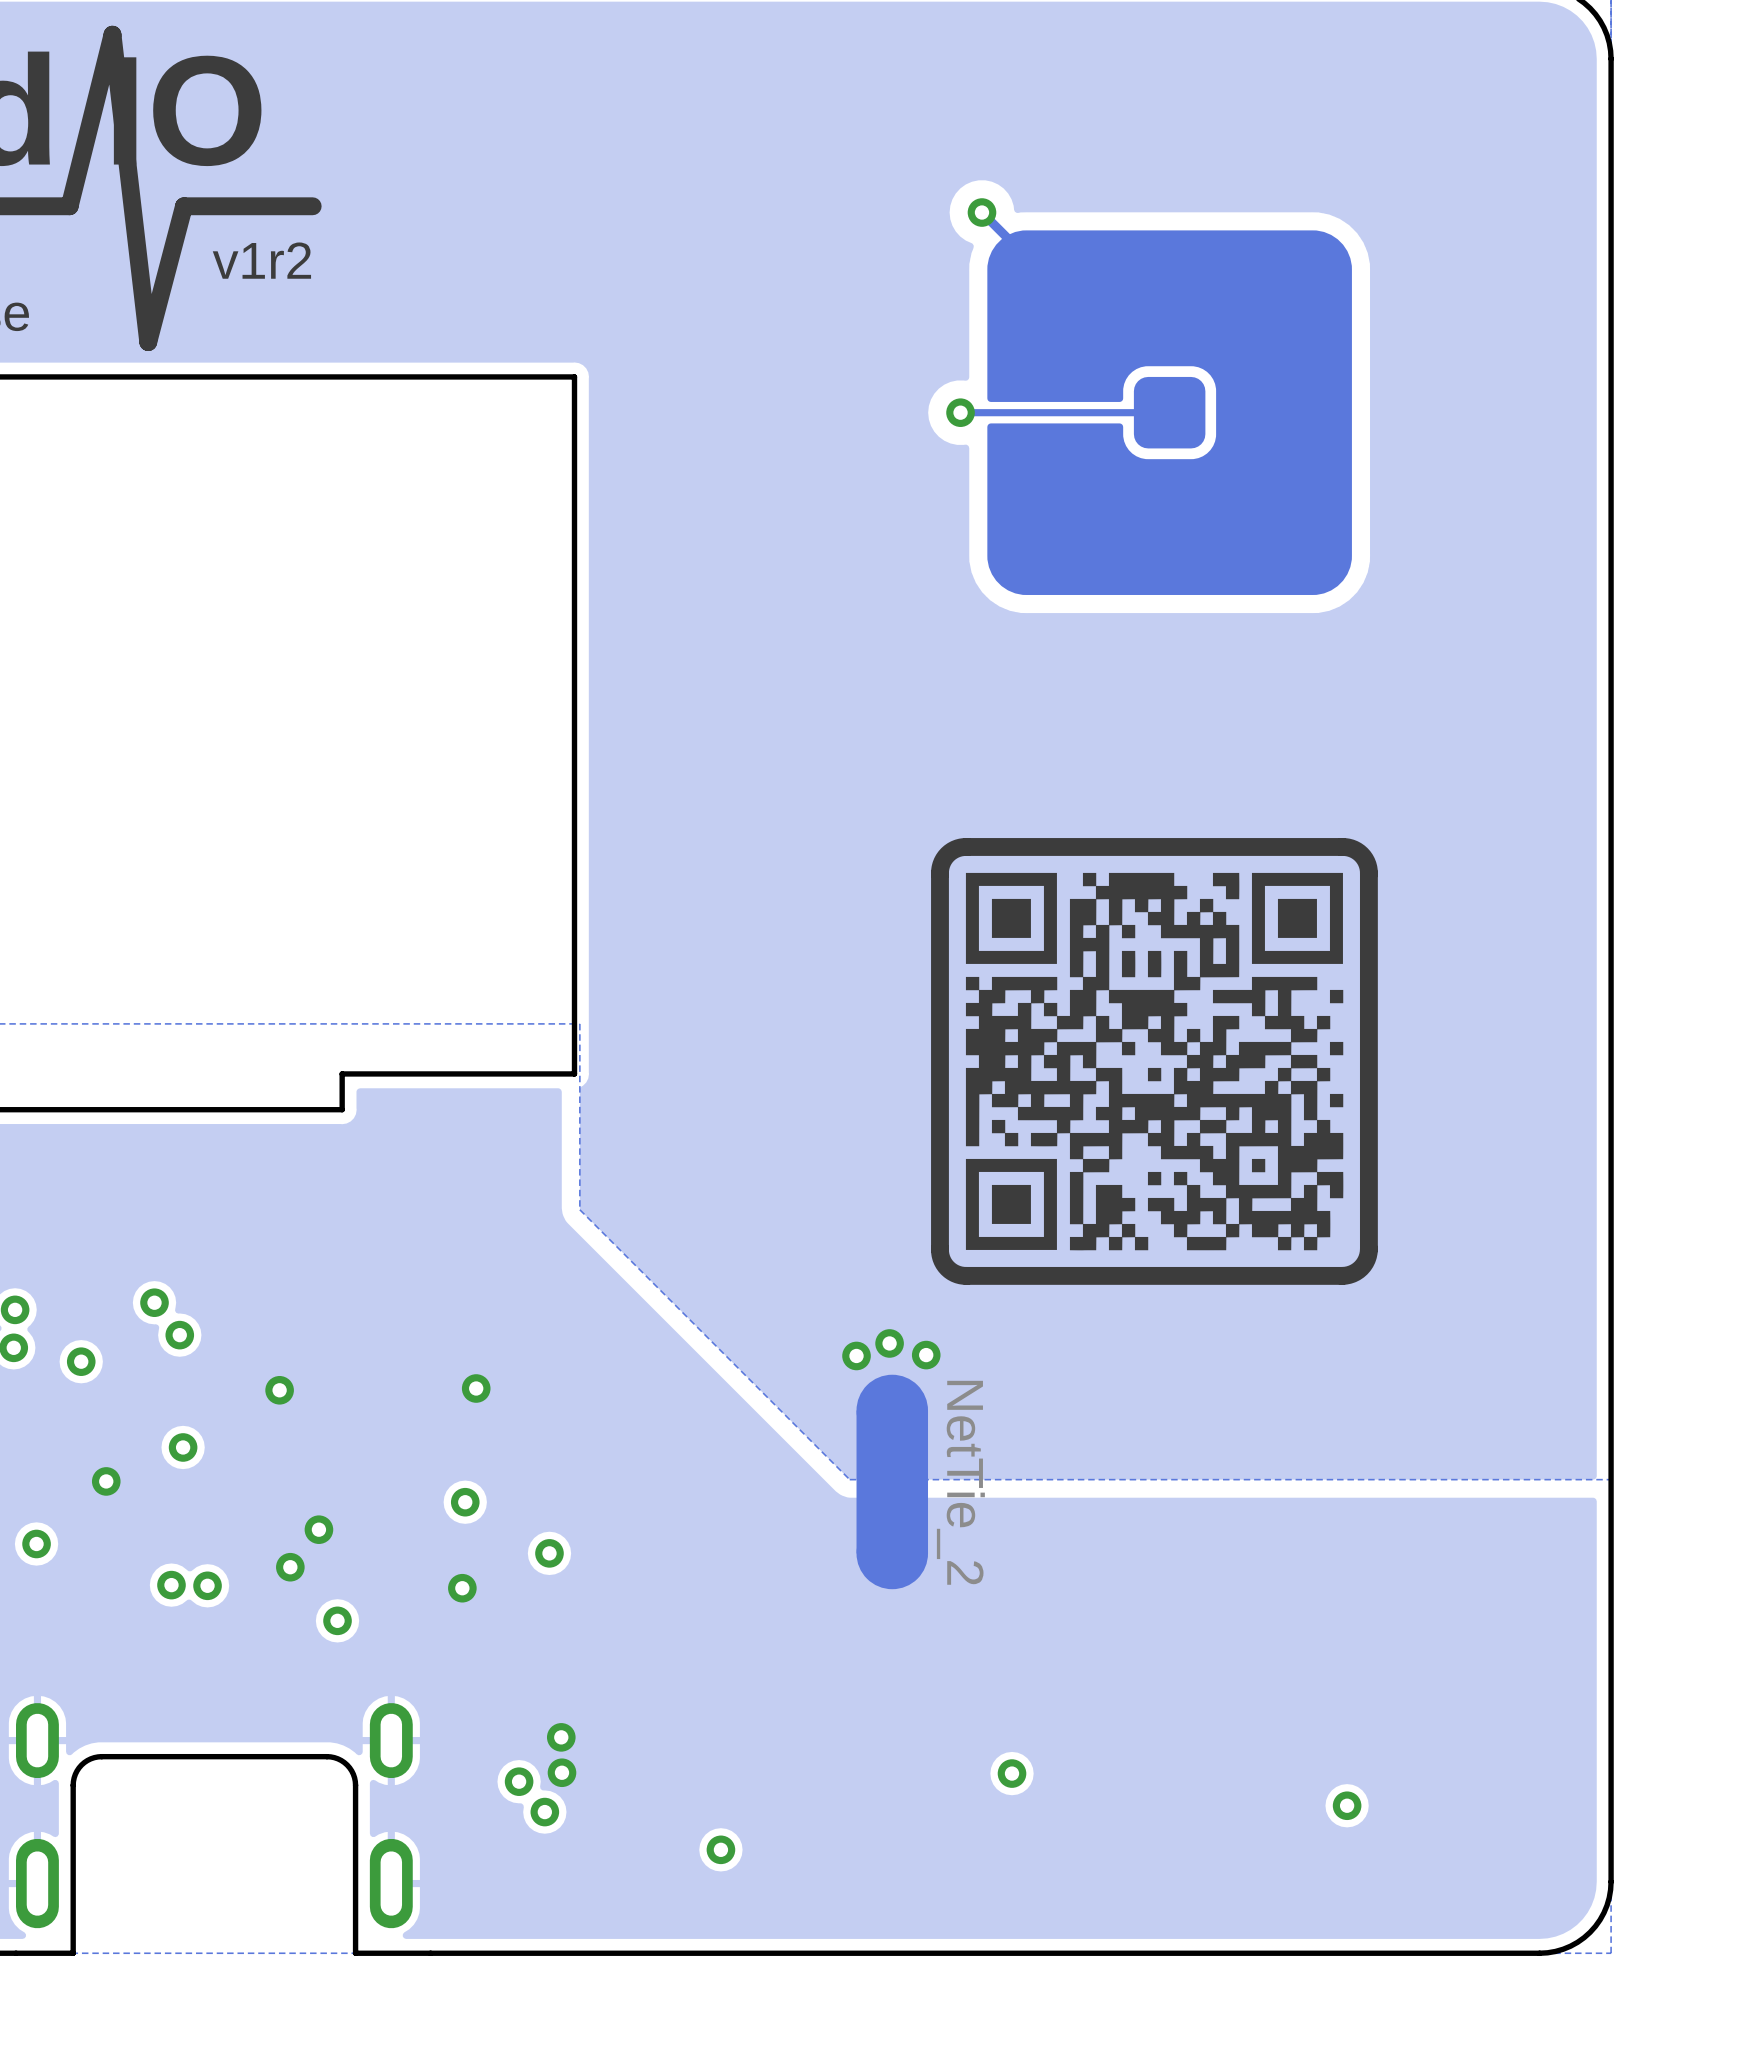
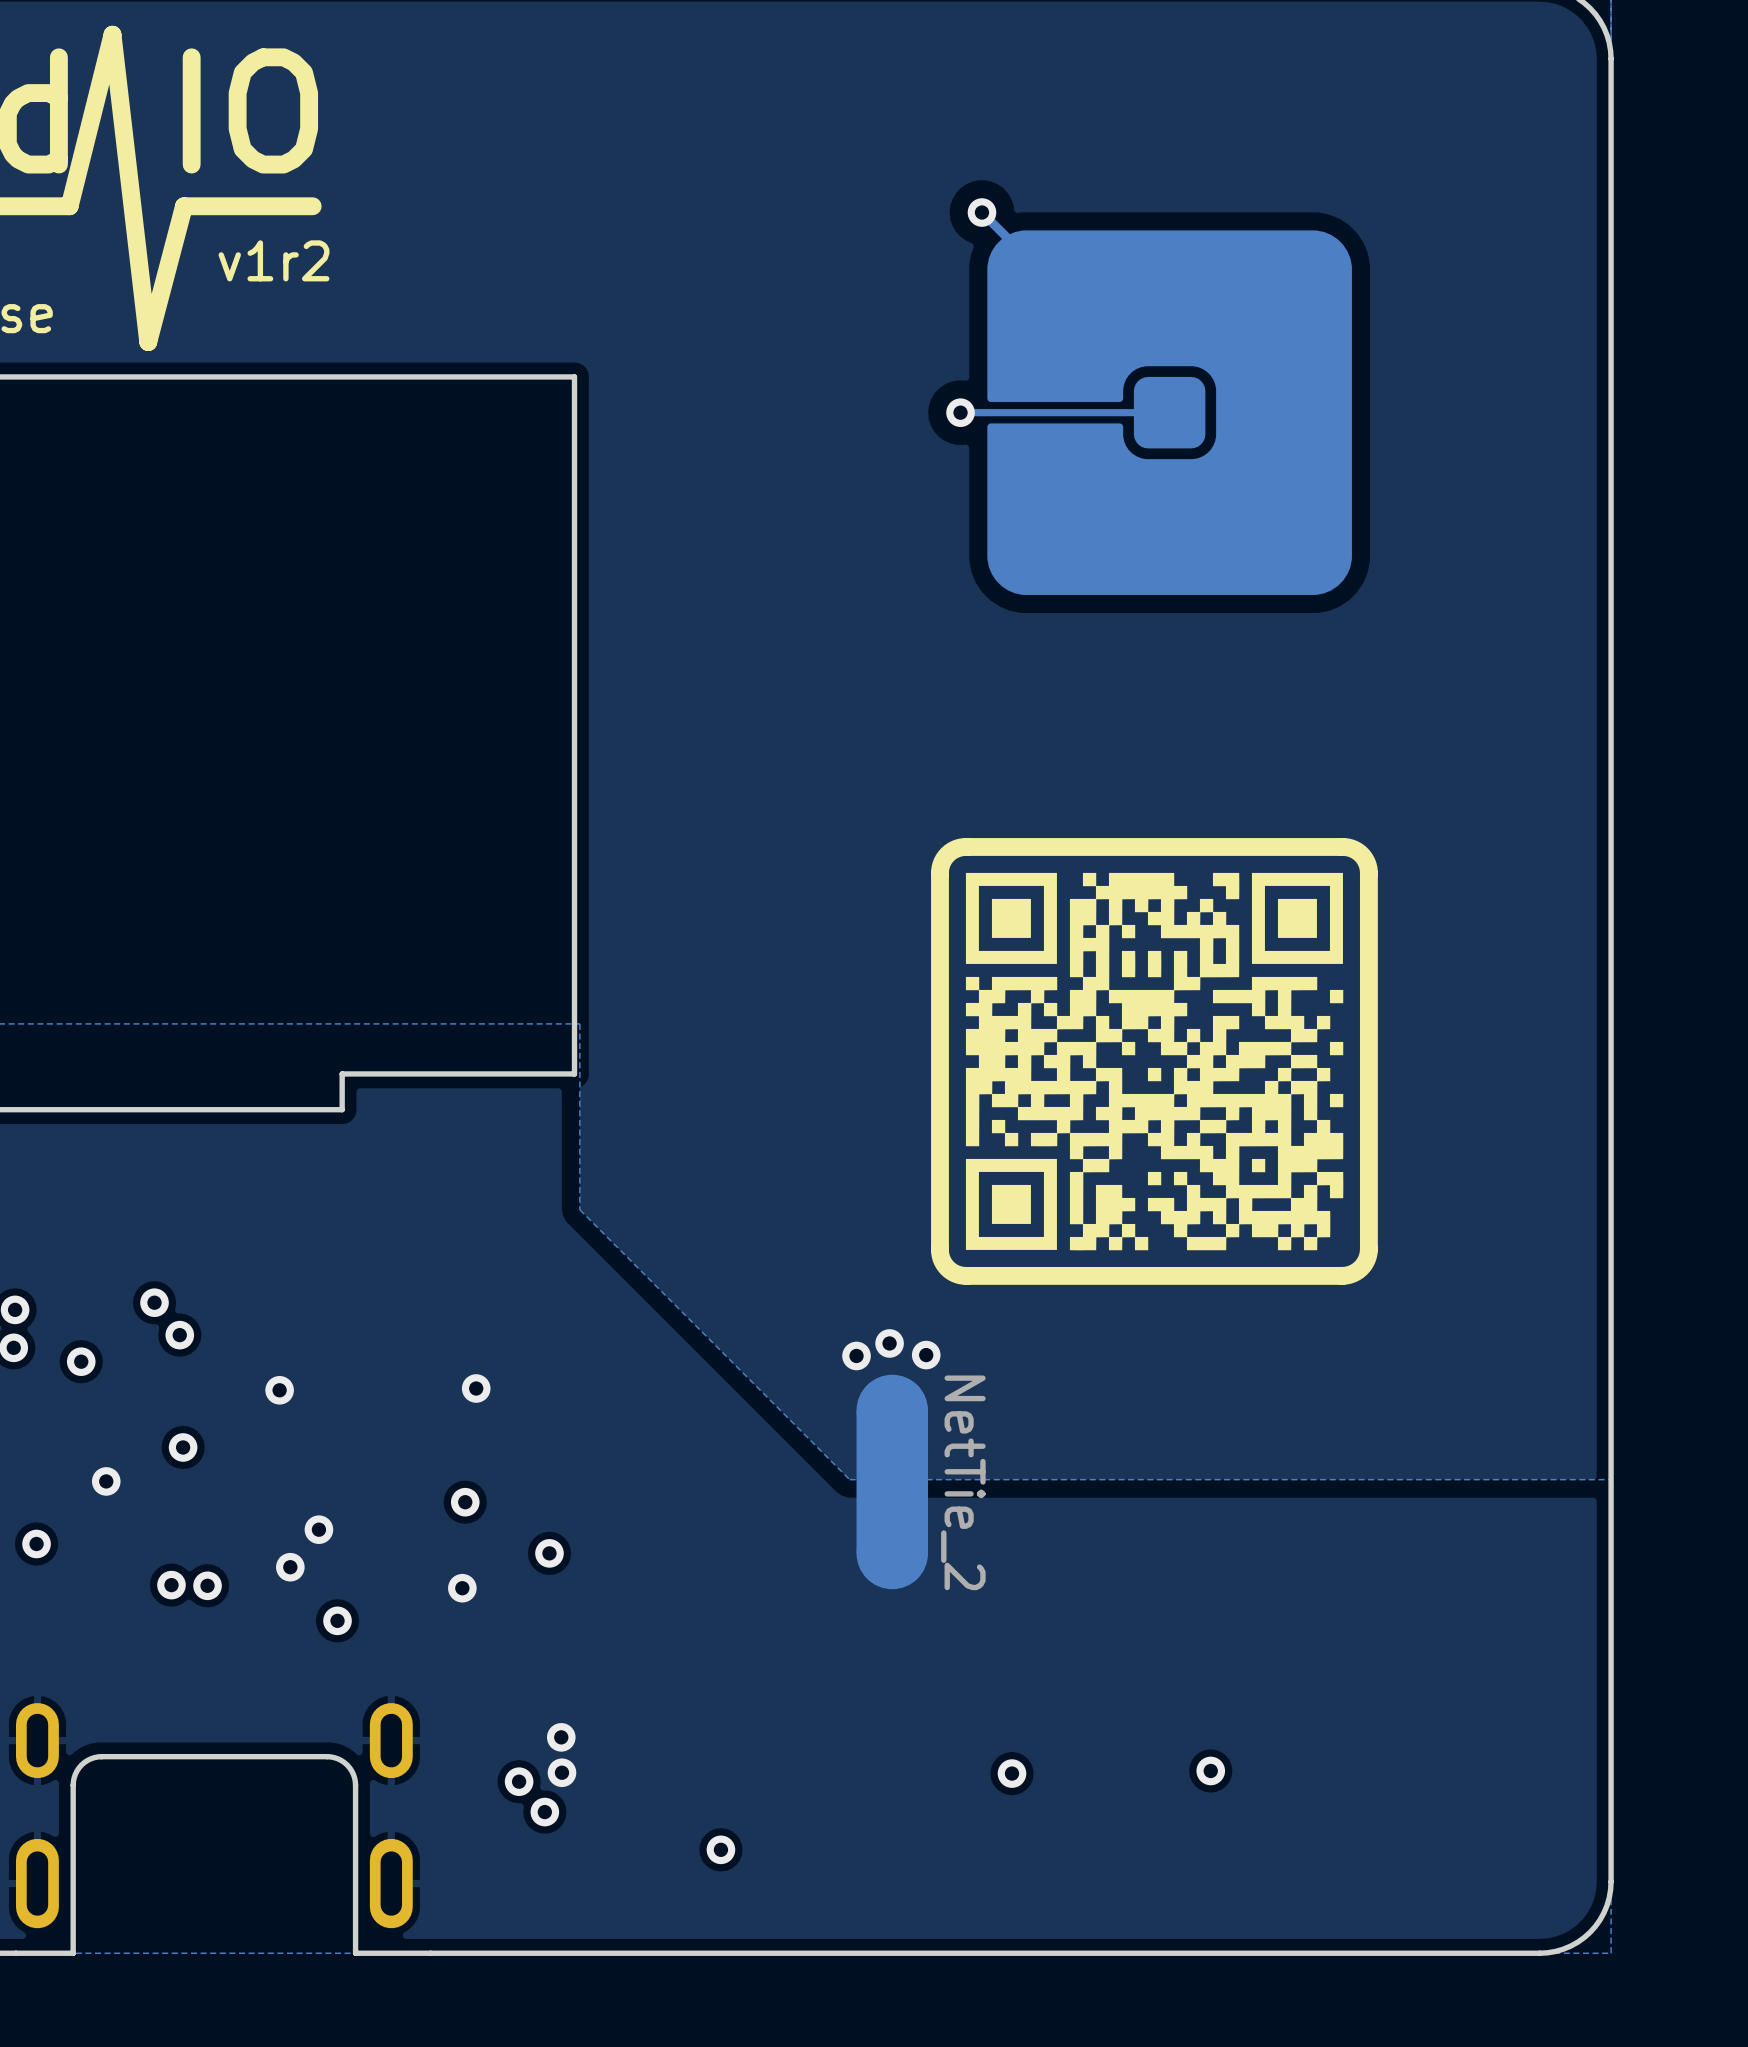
via position: (1347, 1805) -> (1210, 1770)

